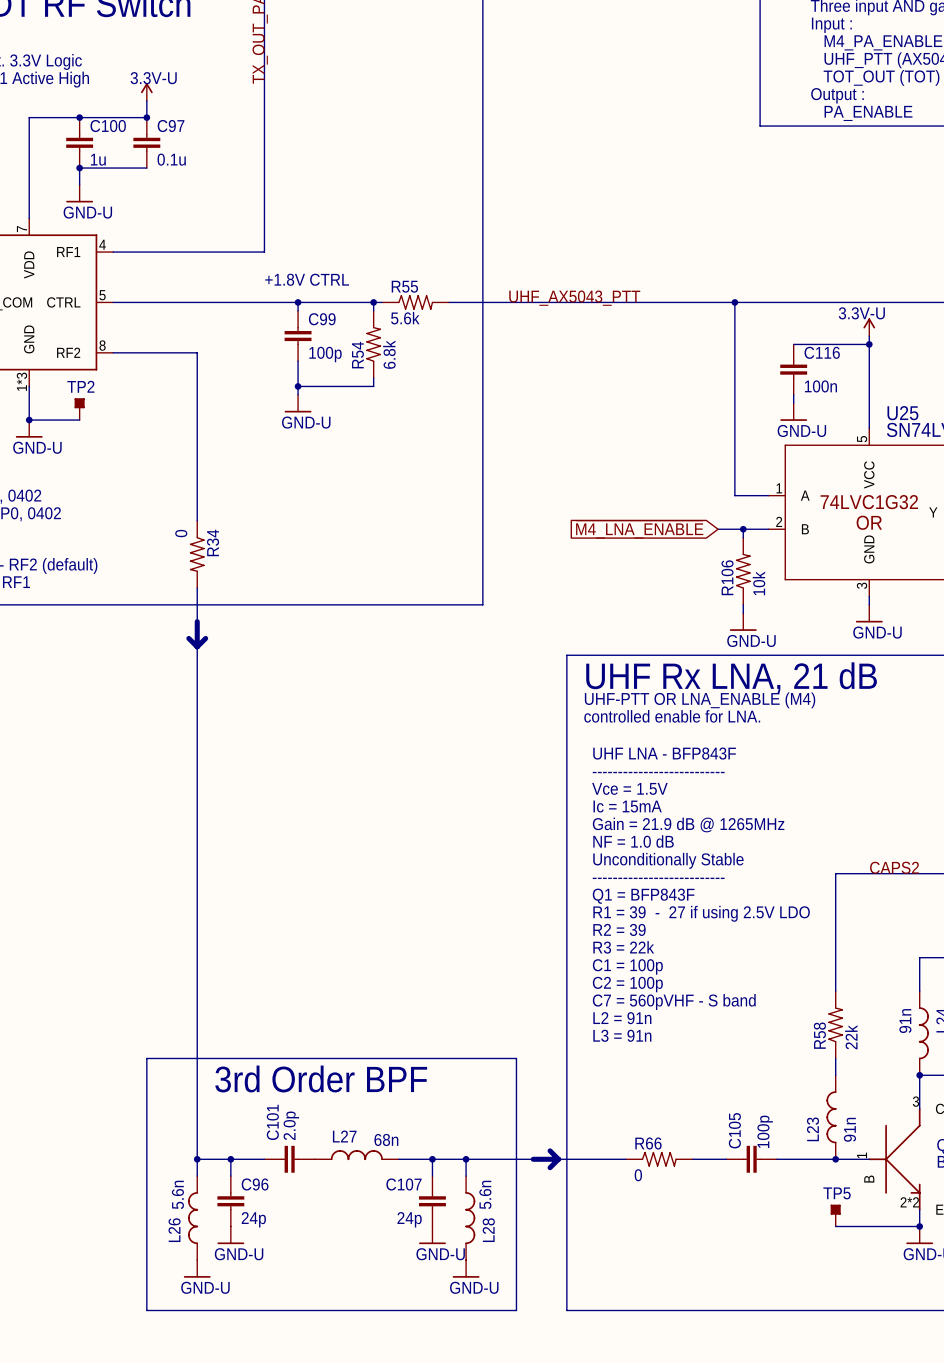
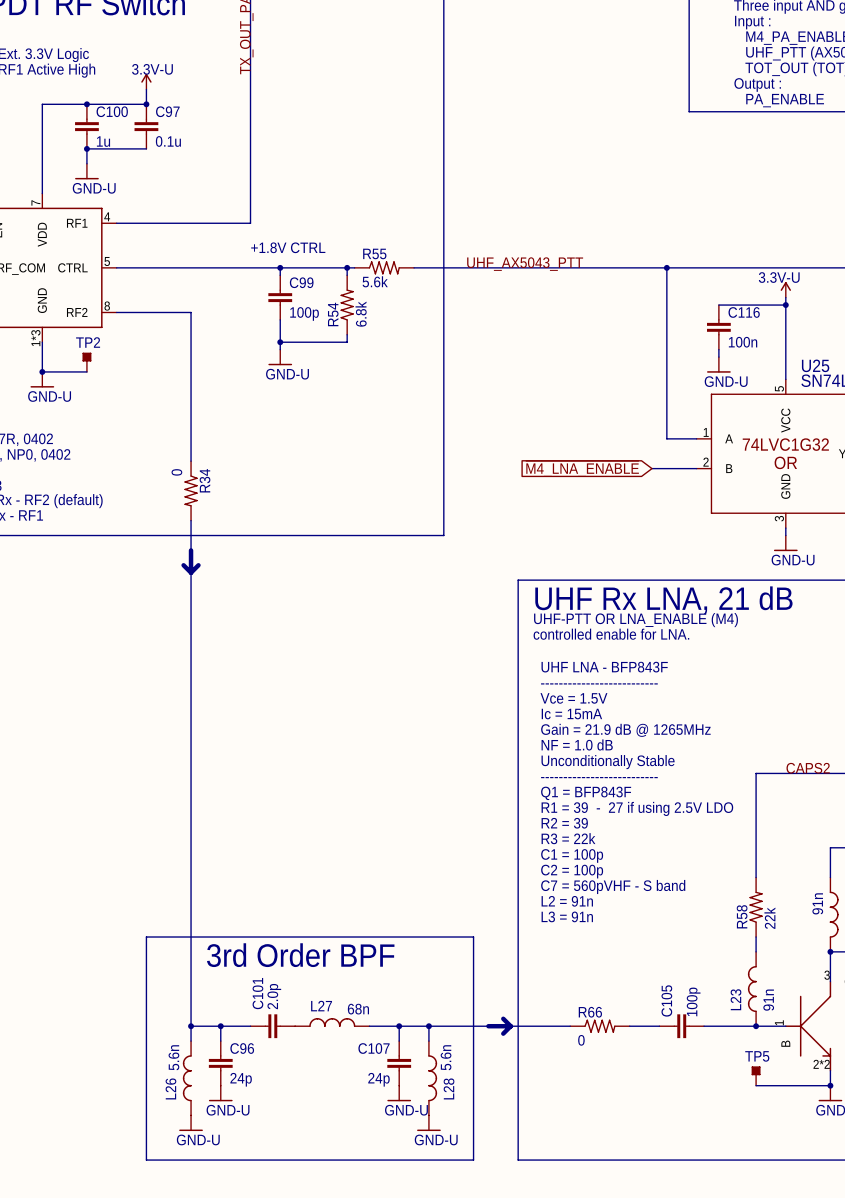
wire: (743, 529) (743, 537) -> none
junction: (743, 529) -> none
R106: 10k (743, 571) -> none
wire: (743, 604) (743, 613) -> none
power symbol: GND-U (743, 622) -> none

